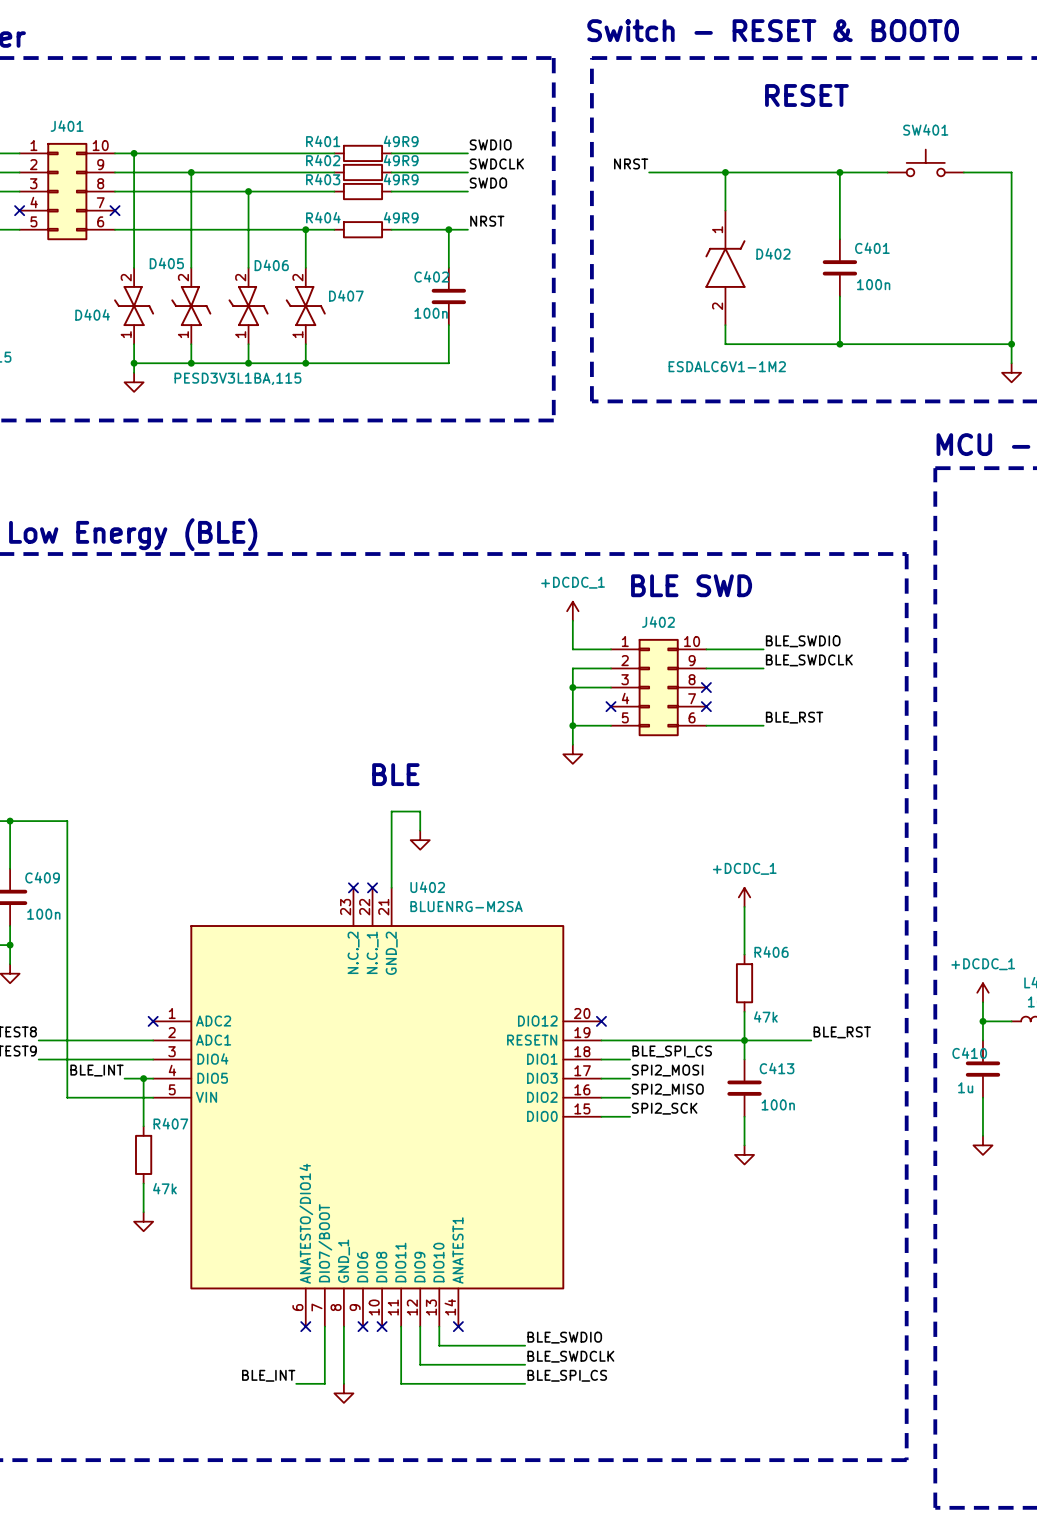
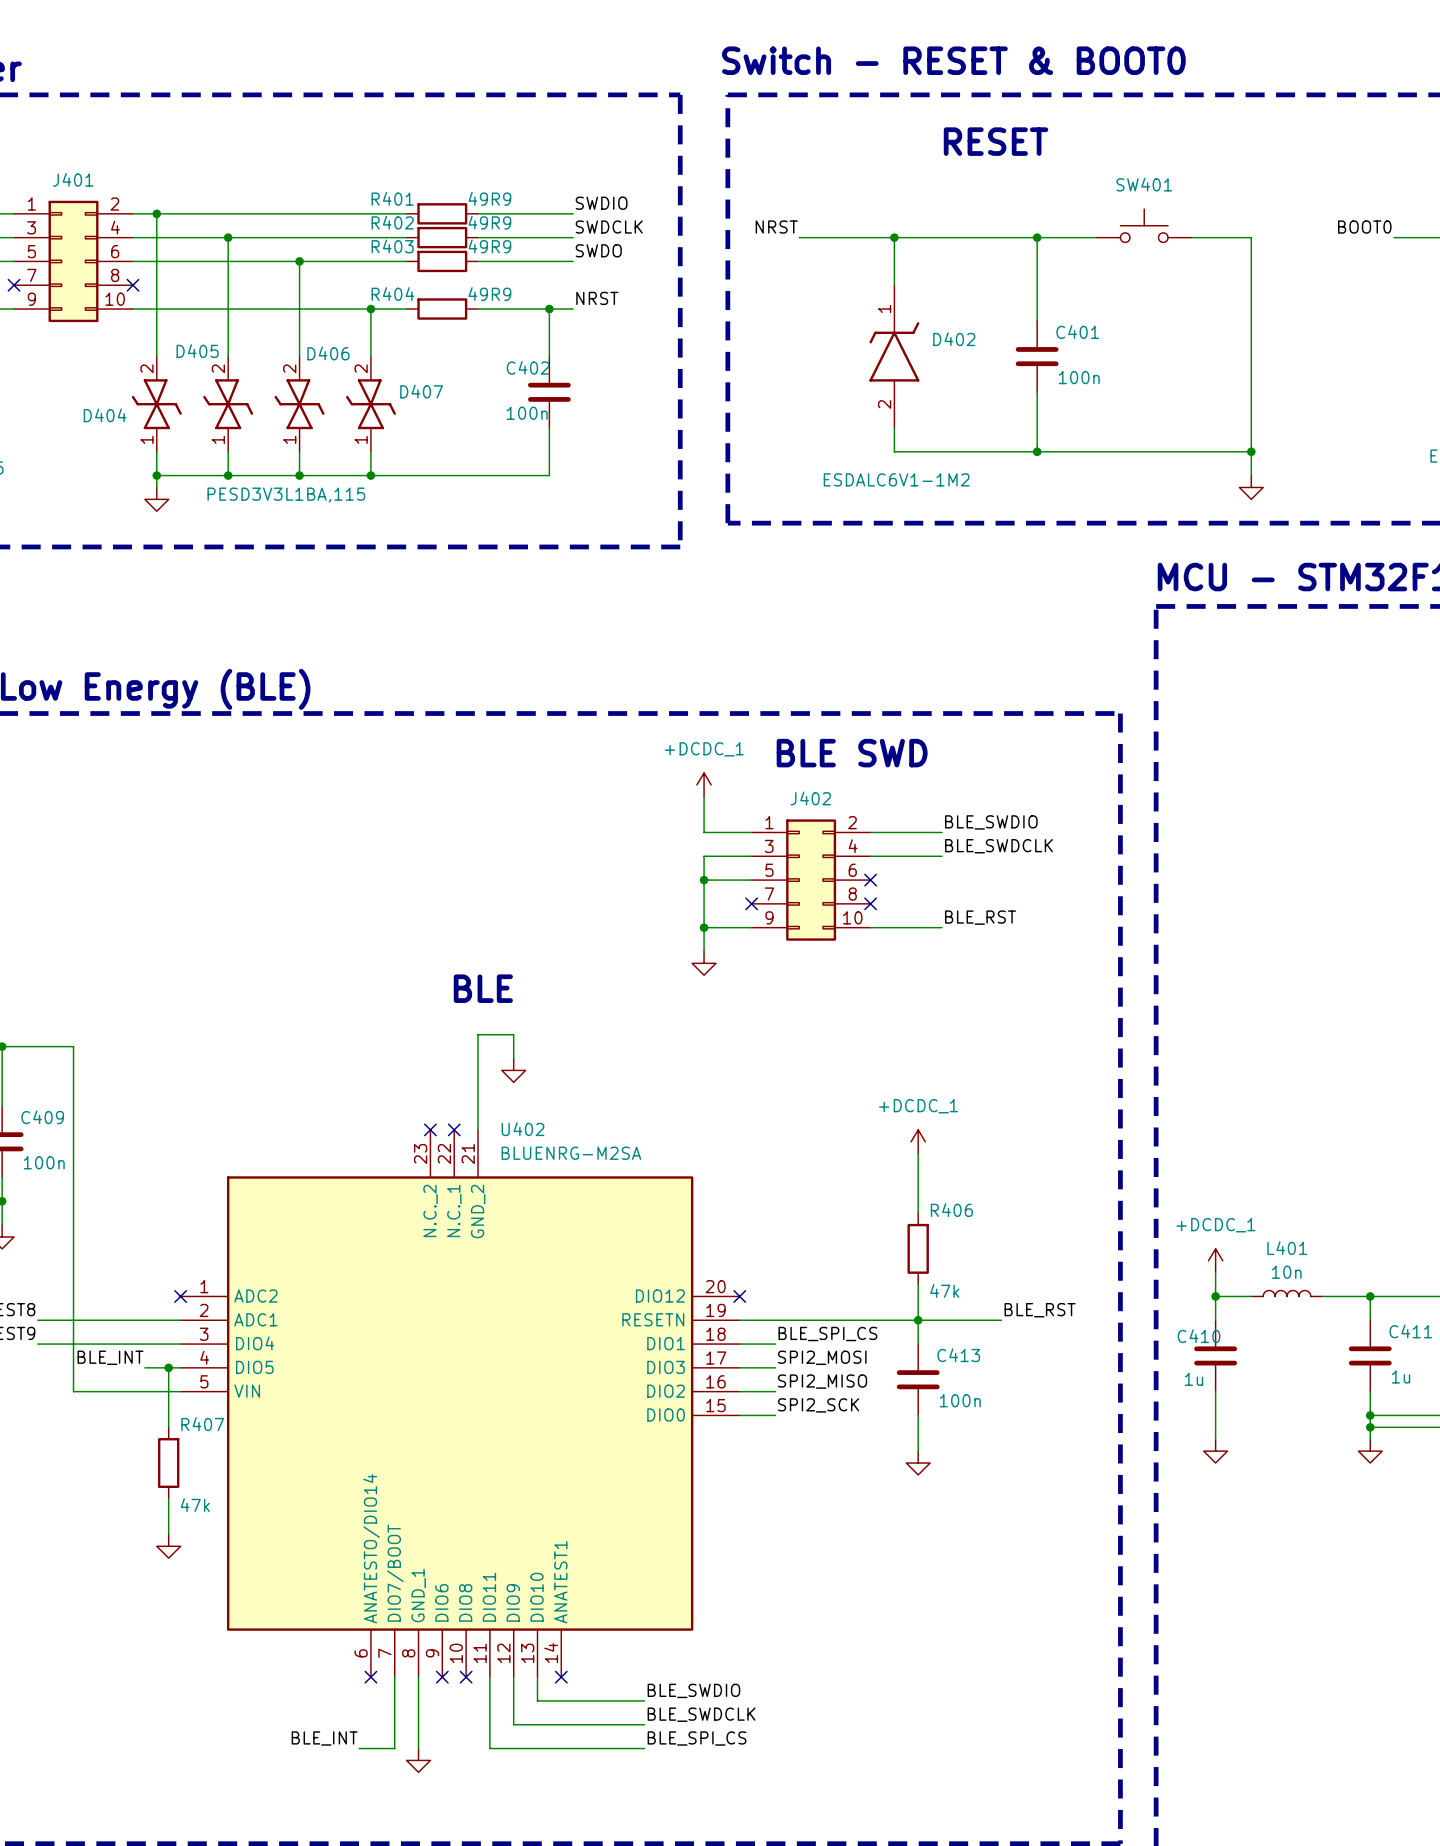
J401 symbol: [19, 142, 116, 241] -> [14, 200, 134, 323]
J402 symbol: [610, 638, 707, 737] -> [751, 819, 871, 941]

